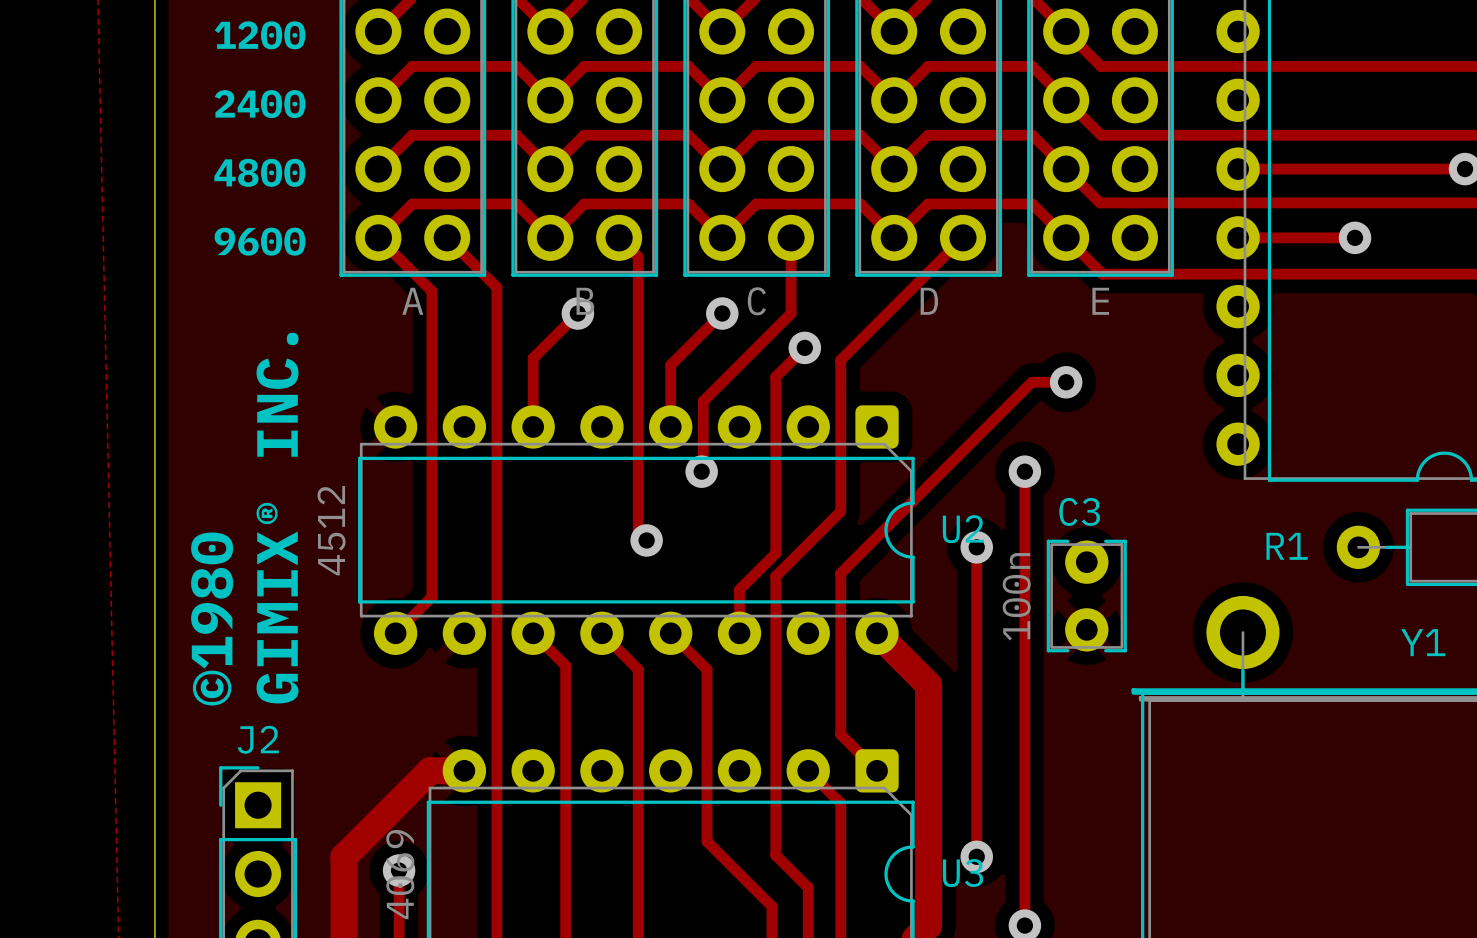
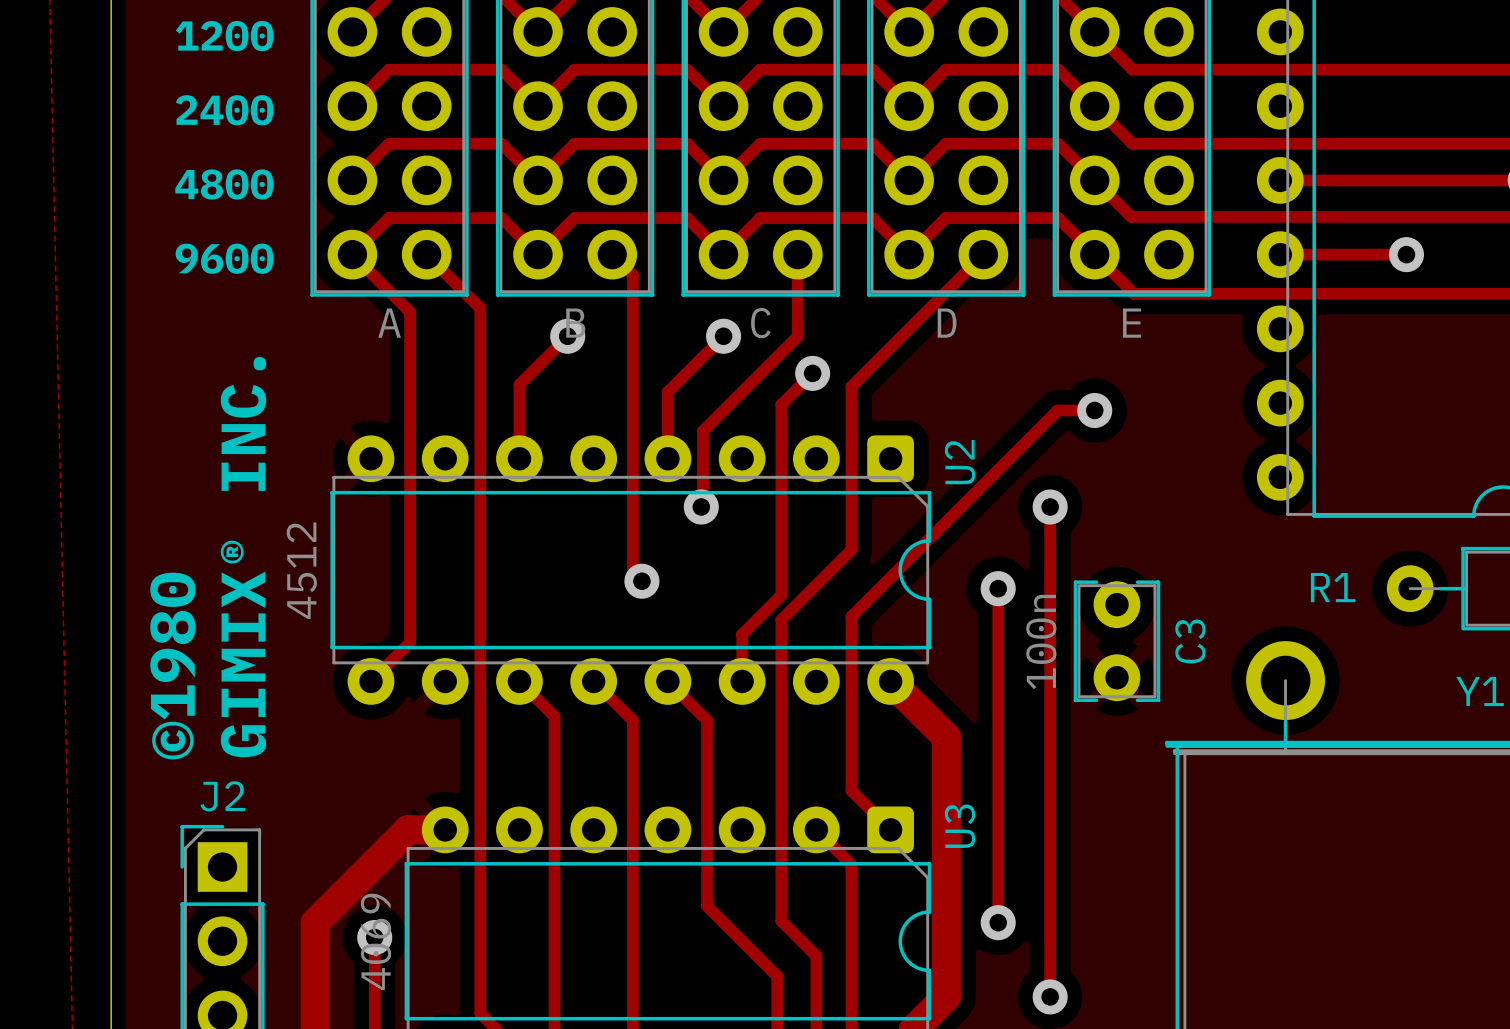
C3 name rotation: 0° (1079, 511) -> 90° counterclockwise (1190, 641)
C3 name position: C3 (1079, 511) -> C3 (1190, 641)
U2 name rotation: 0° (963, 529) -> 90° counterclockwise (960, 462)
U2 name position: U2 (963, 529) -> U2 (960, 462)
U3 name rotation: 0° (962, 872) -> 90° counterclockwise (960, 826)
U3 name position: U3 (962, 872) -> U3 (960, 826)

